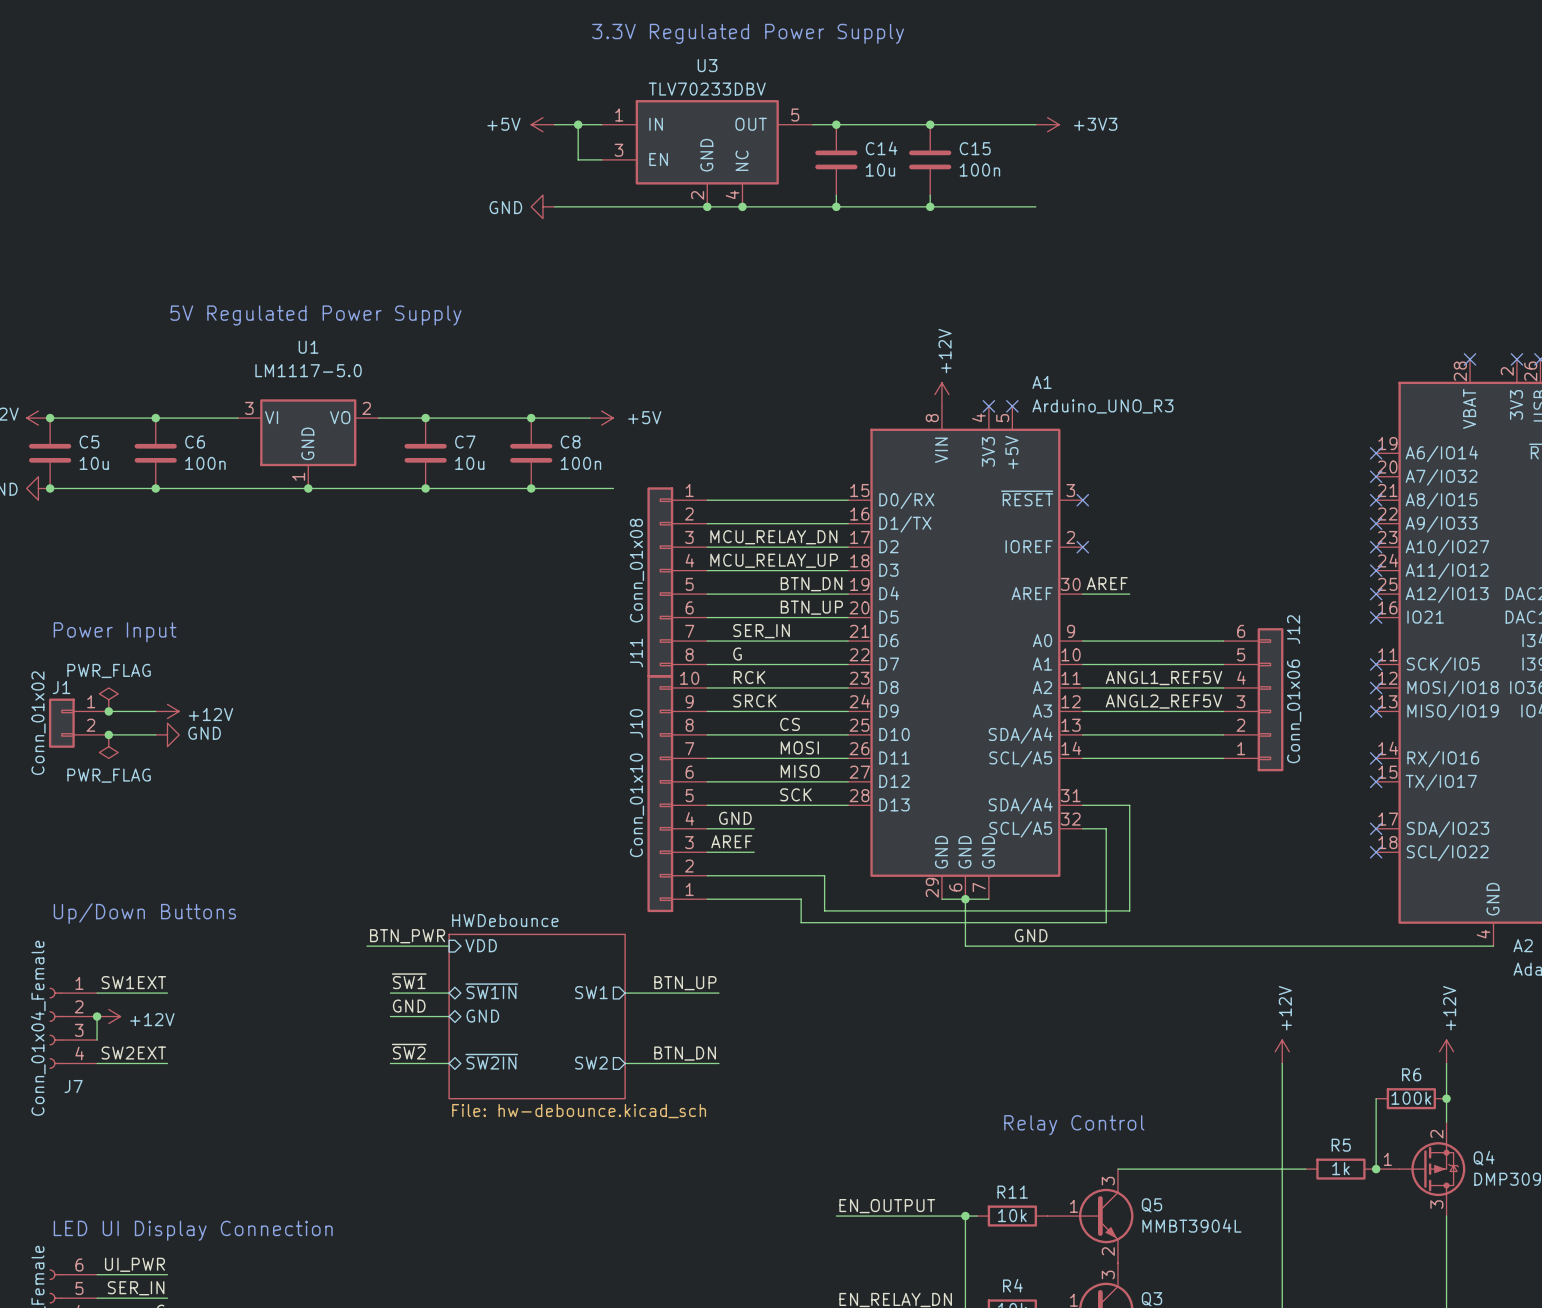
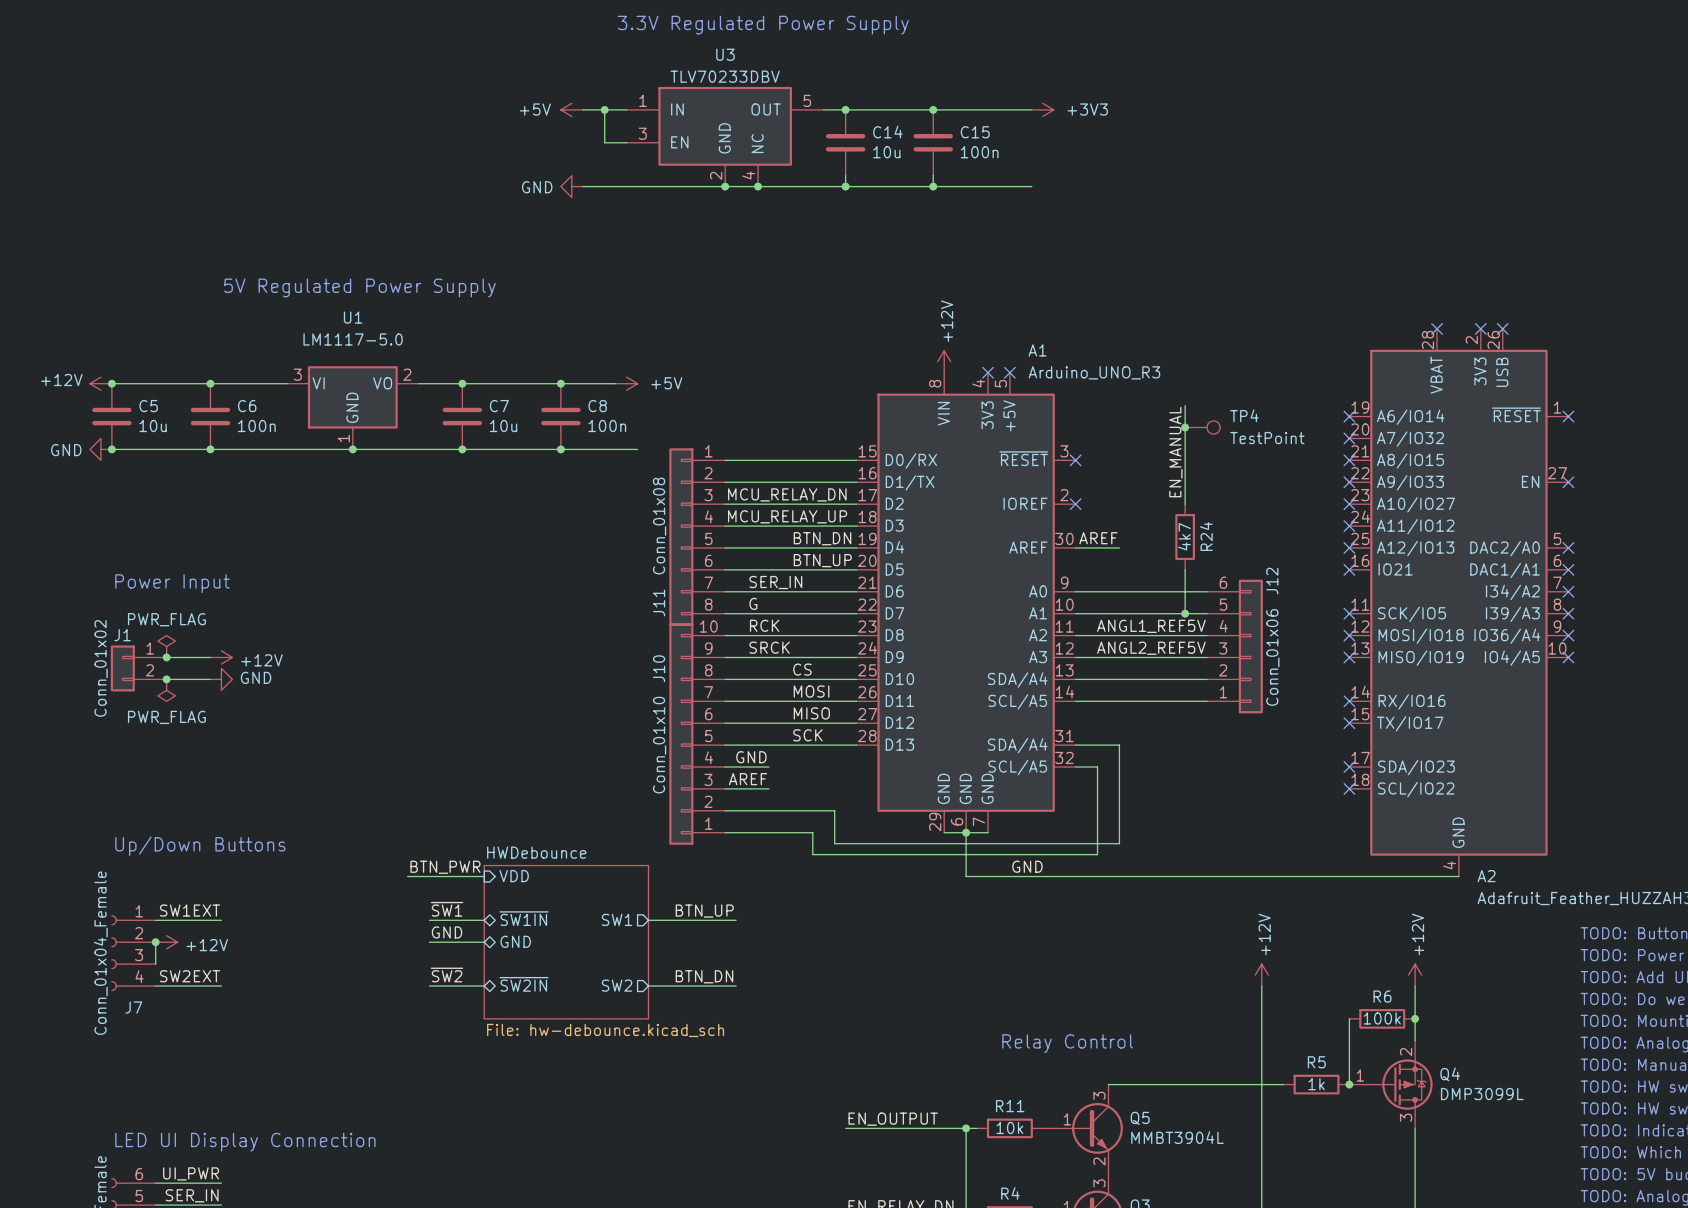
wire: none -> (1185, 405) (1185, 504)
junction: none -> (1185, 427)
TP4: none -> TestPoint (1202, 427)
label: none -> EN_MANUAL (1175, 452)
R24: none -> 4k7 (1185, 537)
wire: none -> (1185, 569) (1185, 613)
junction: none -> (1185, 613)

